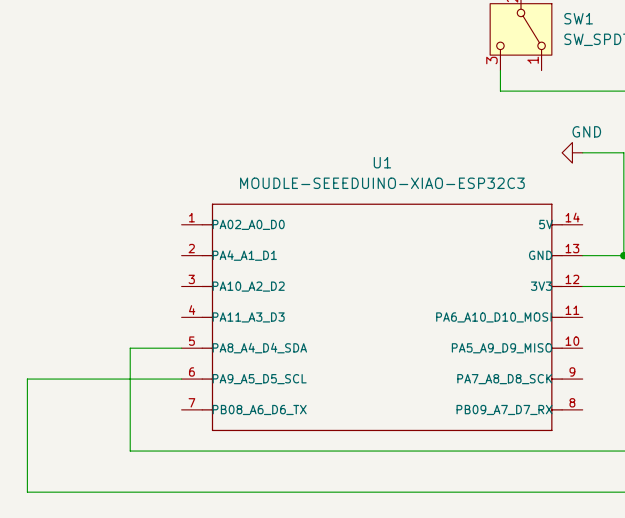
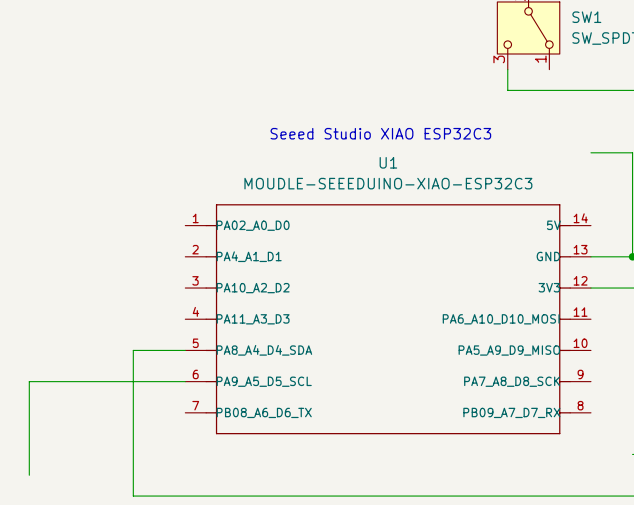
text: none -> Seeed Studio XIAO ESP32C3 (380, 133)
power symbol: GND (572, 152) -> none
wire: (130, 451) (623, 451) -> none
wire: (27, 471) (27, 492) (130, 492) -> (133, 454) (133, 496)

